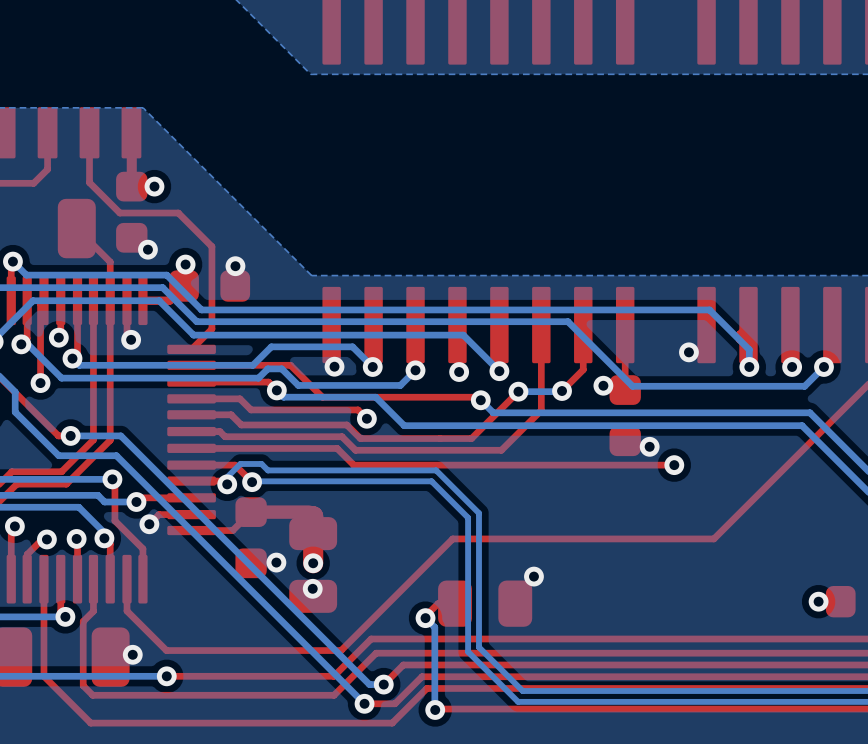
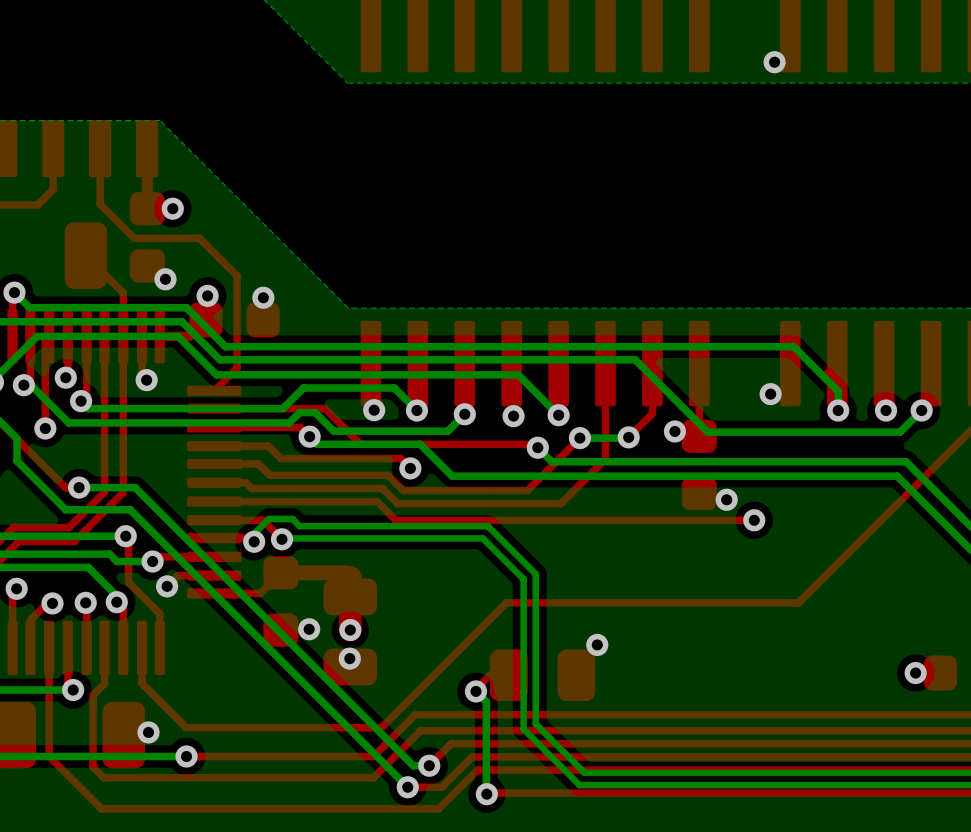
via: none -> (774, 62)

